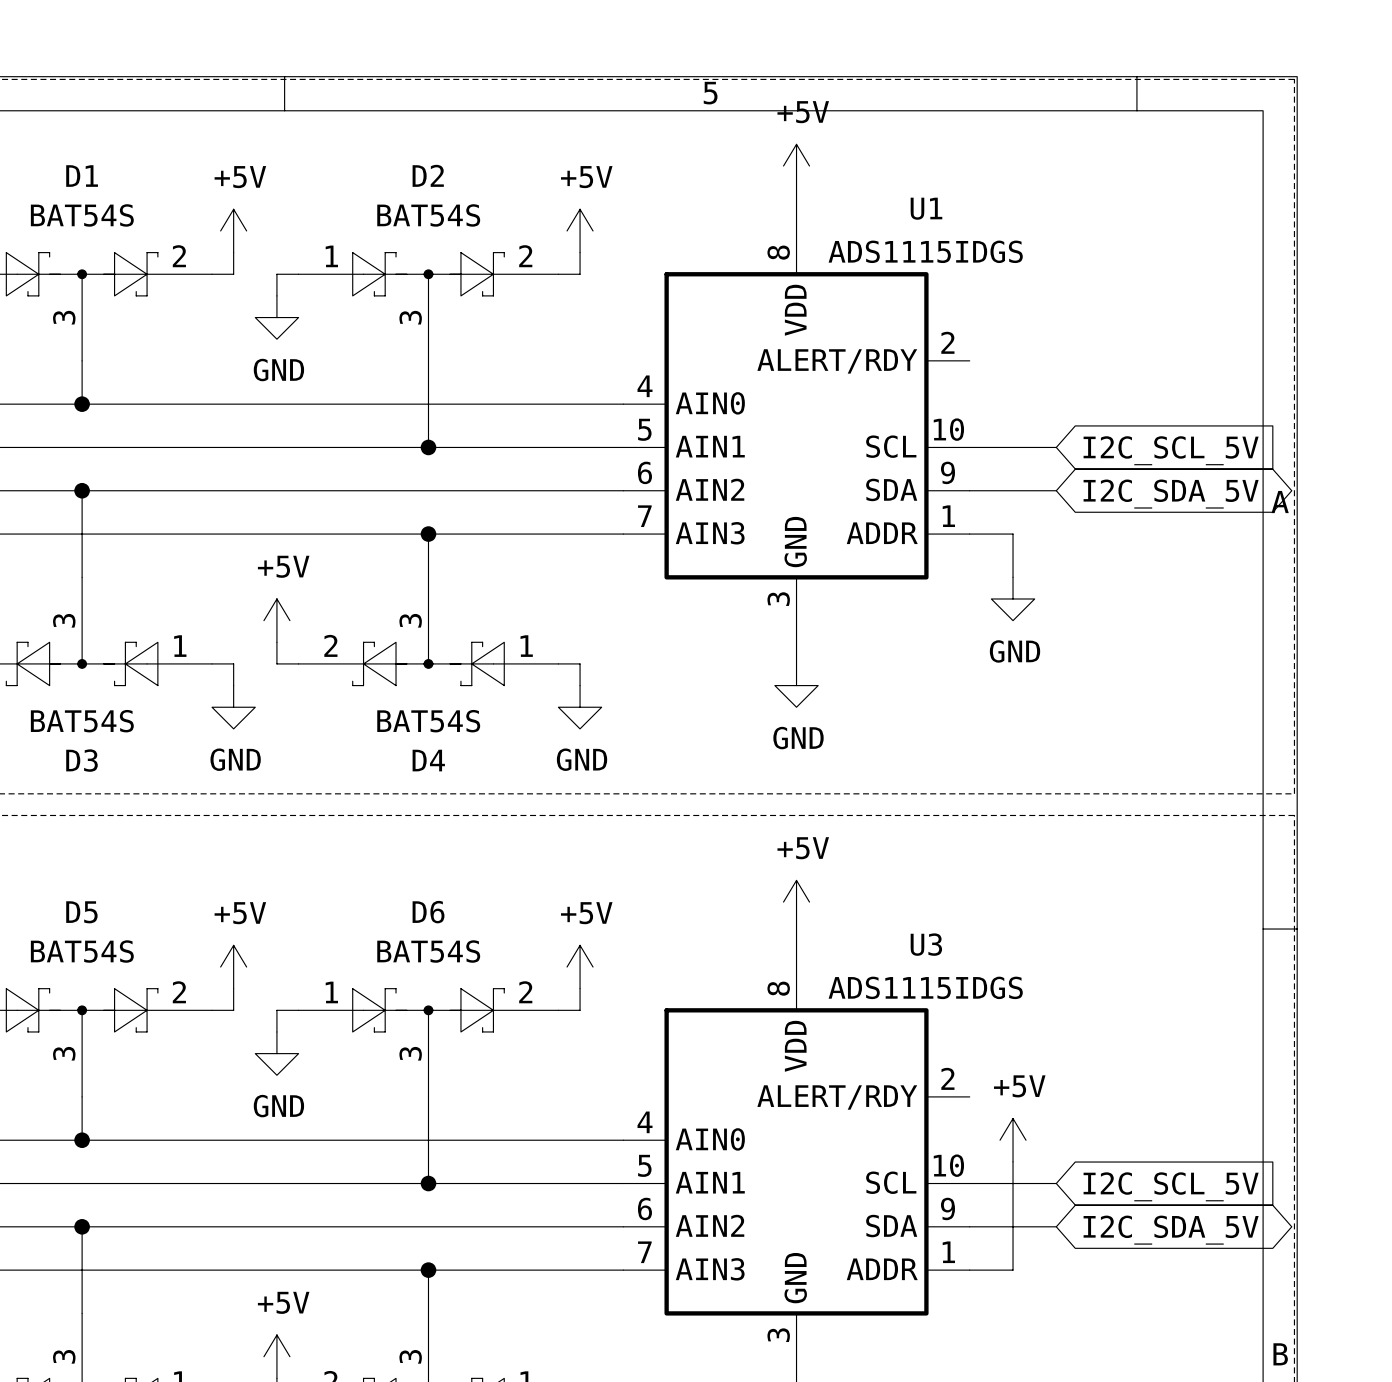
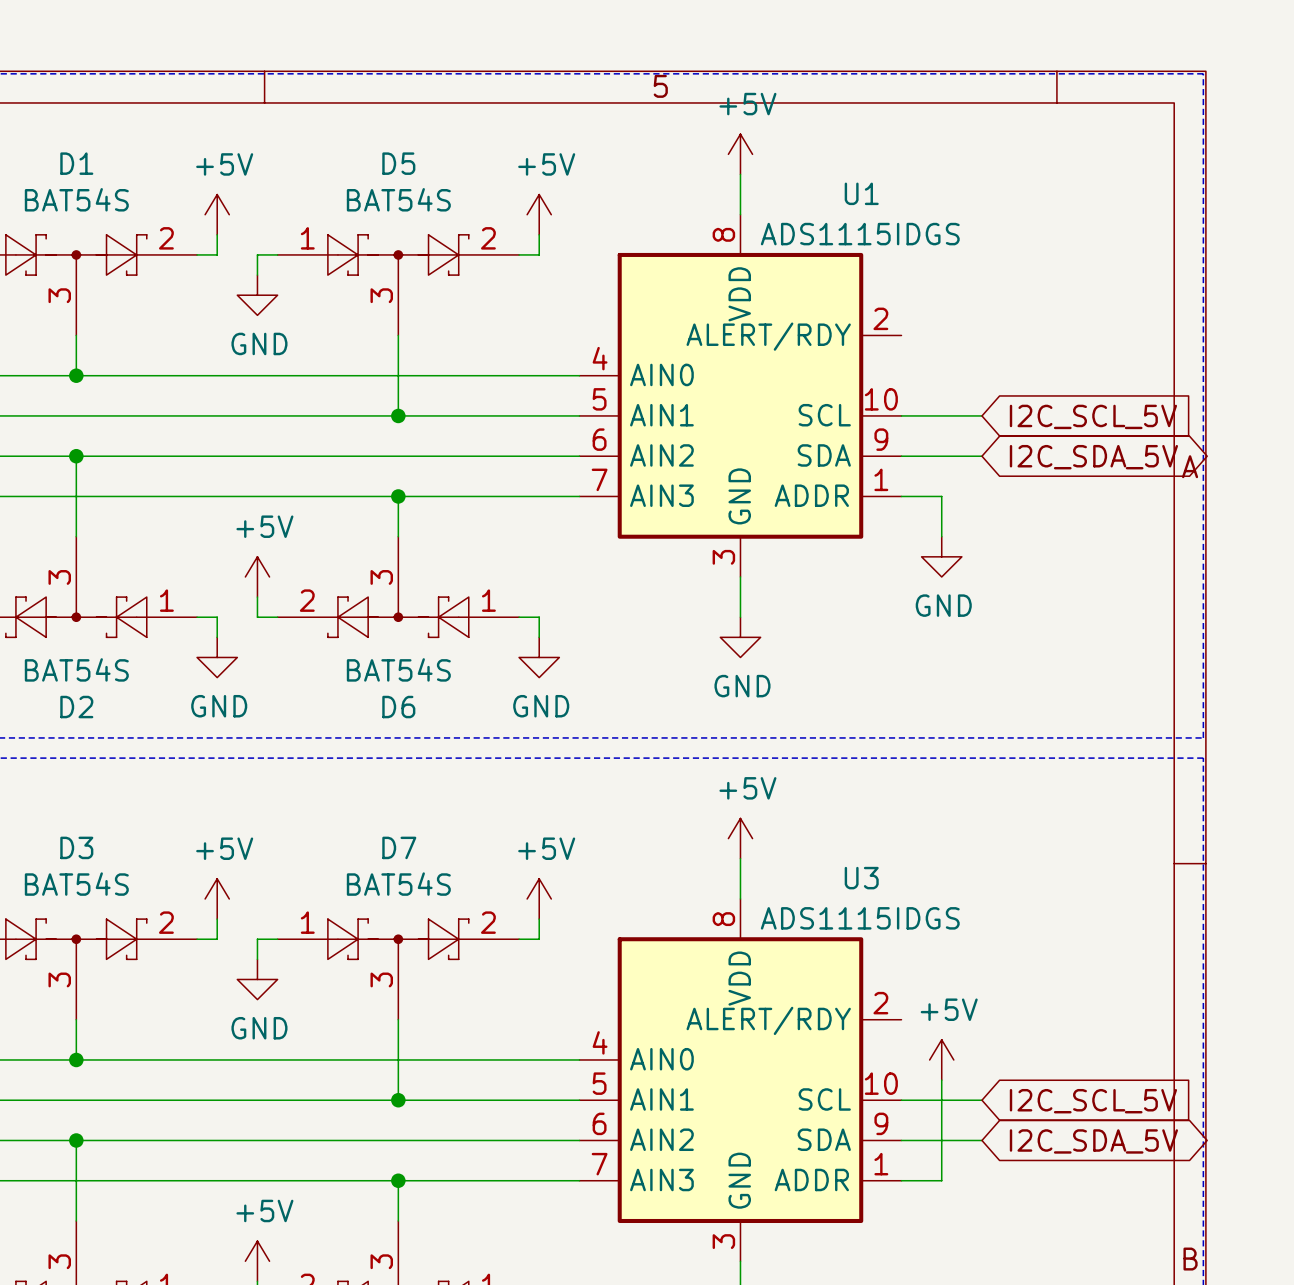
D2 name: D2 (428, 175) -> D5 (398, 163)
D3 name: D3 (81, 760) -> D2 (76, 707)
D4 name: D4 (428, 760) -> D6 (398, 707)
D5 name: D5 (81, 912) -> D3 (76, 847)
D6 name: D6 (428, 912) -> D7 (399, 847)

